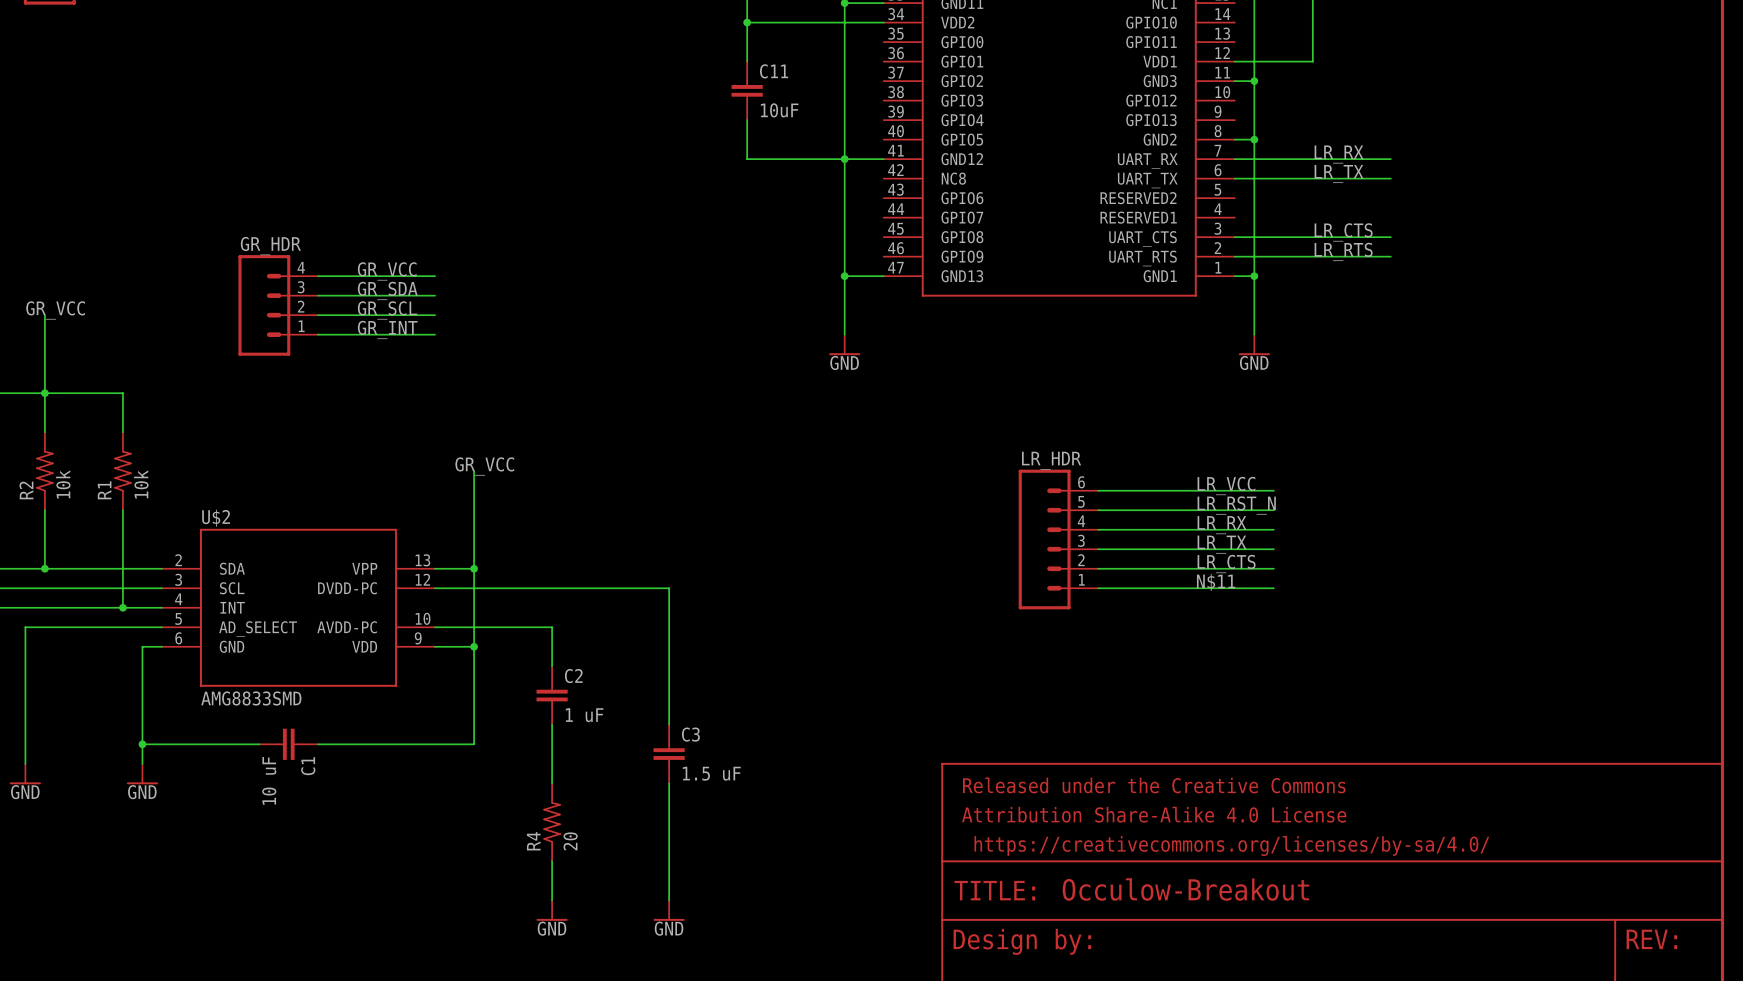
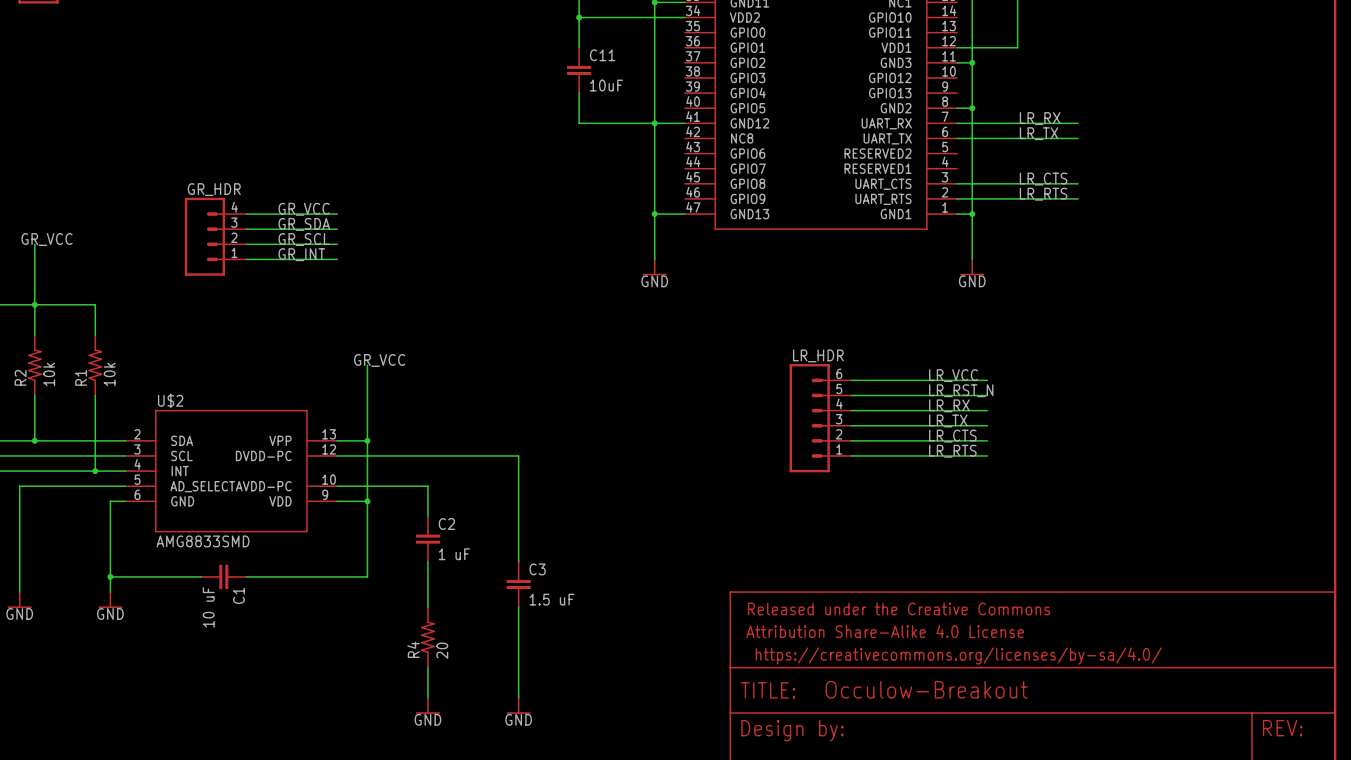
label: N$11 (1216, 582) -> LR_RTS (952, 451)

